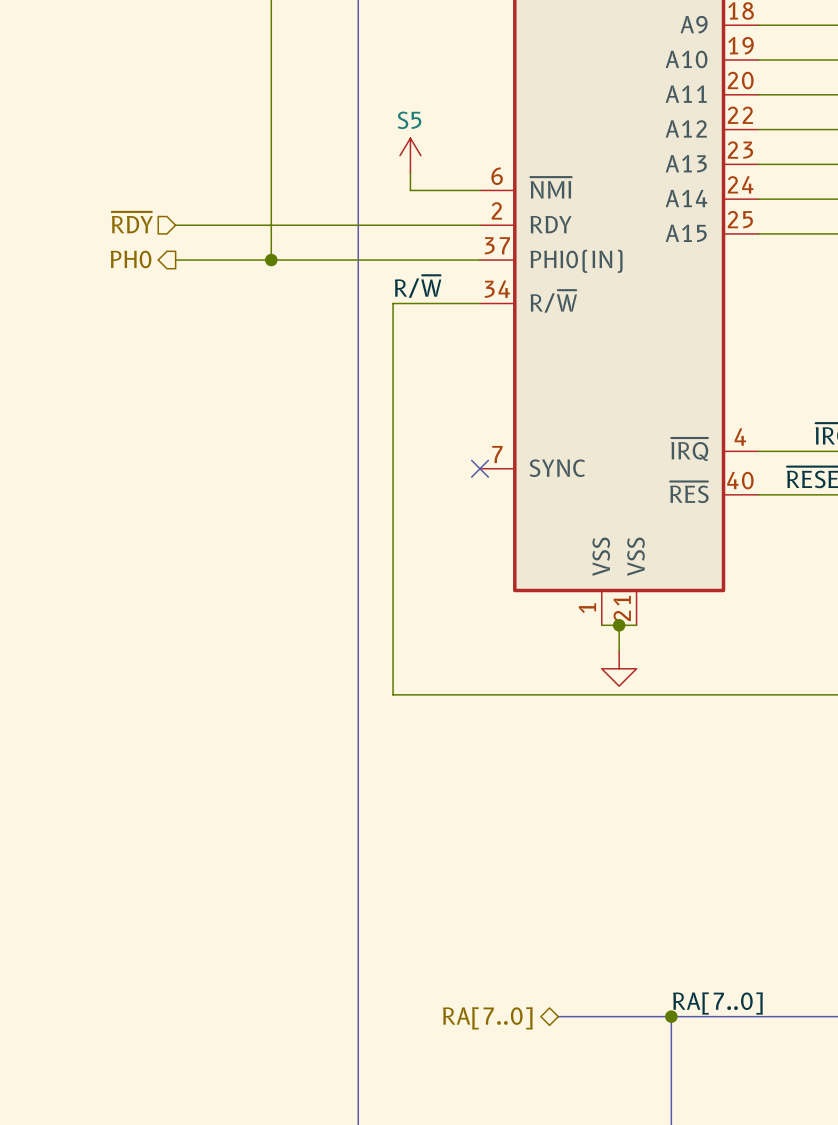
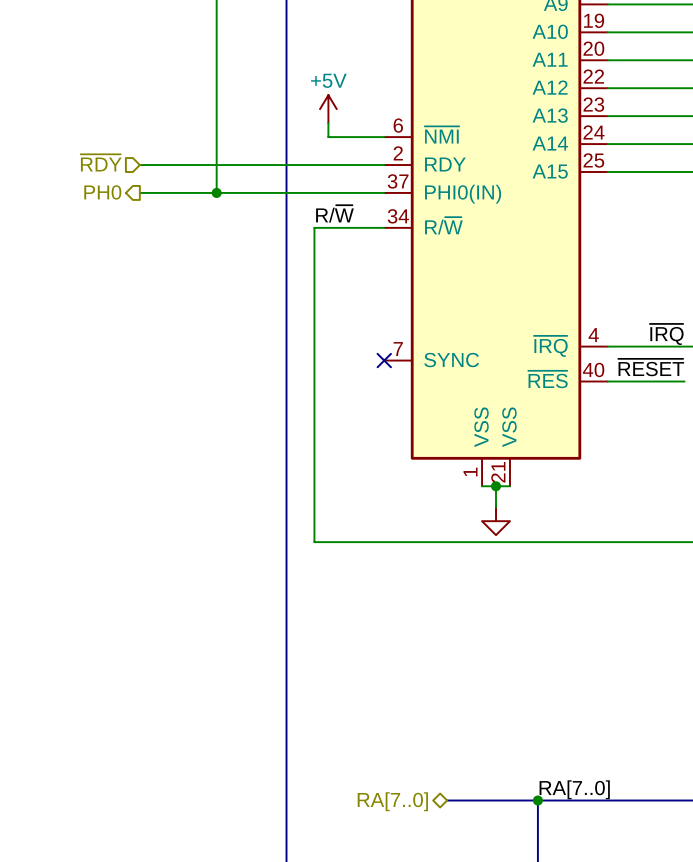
power symbol: S5 (410, 155) -> +5V (328, 109)

